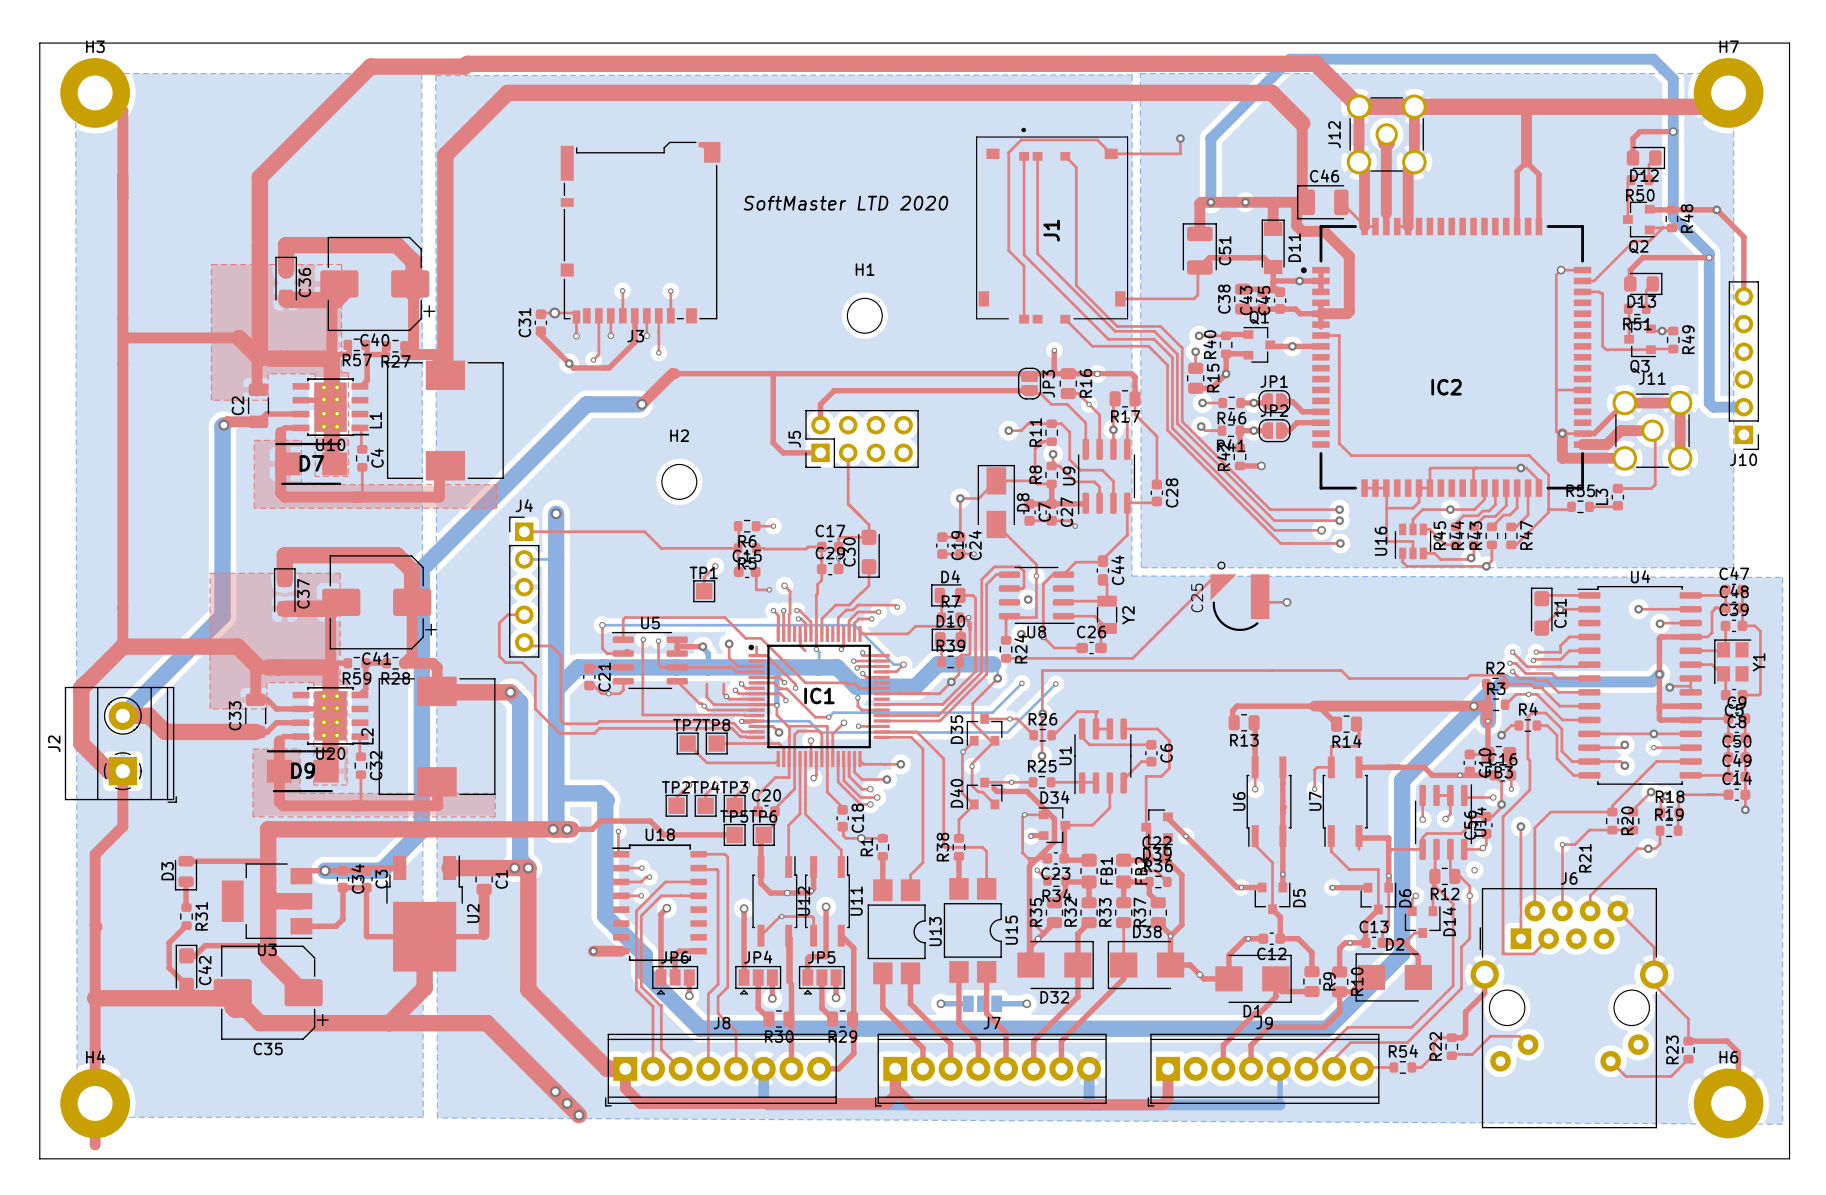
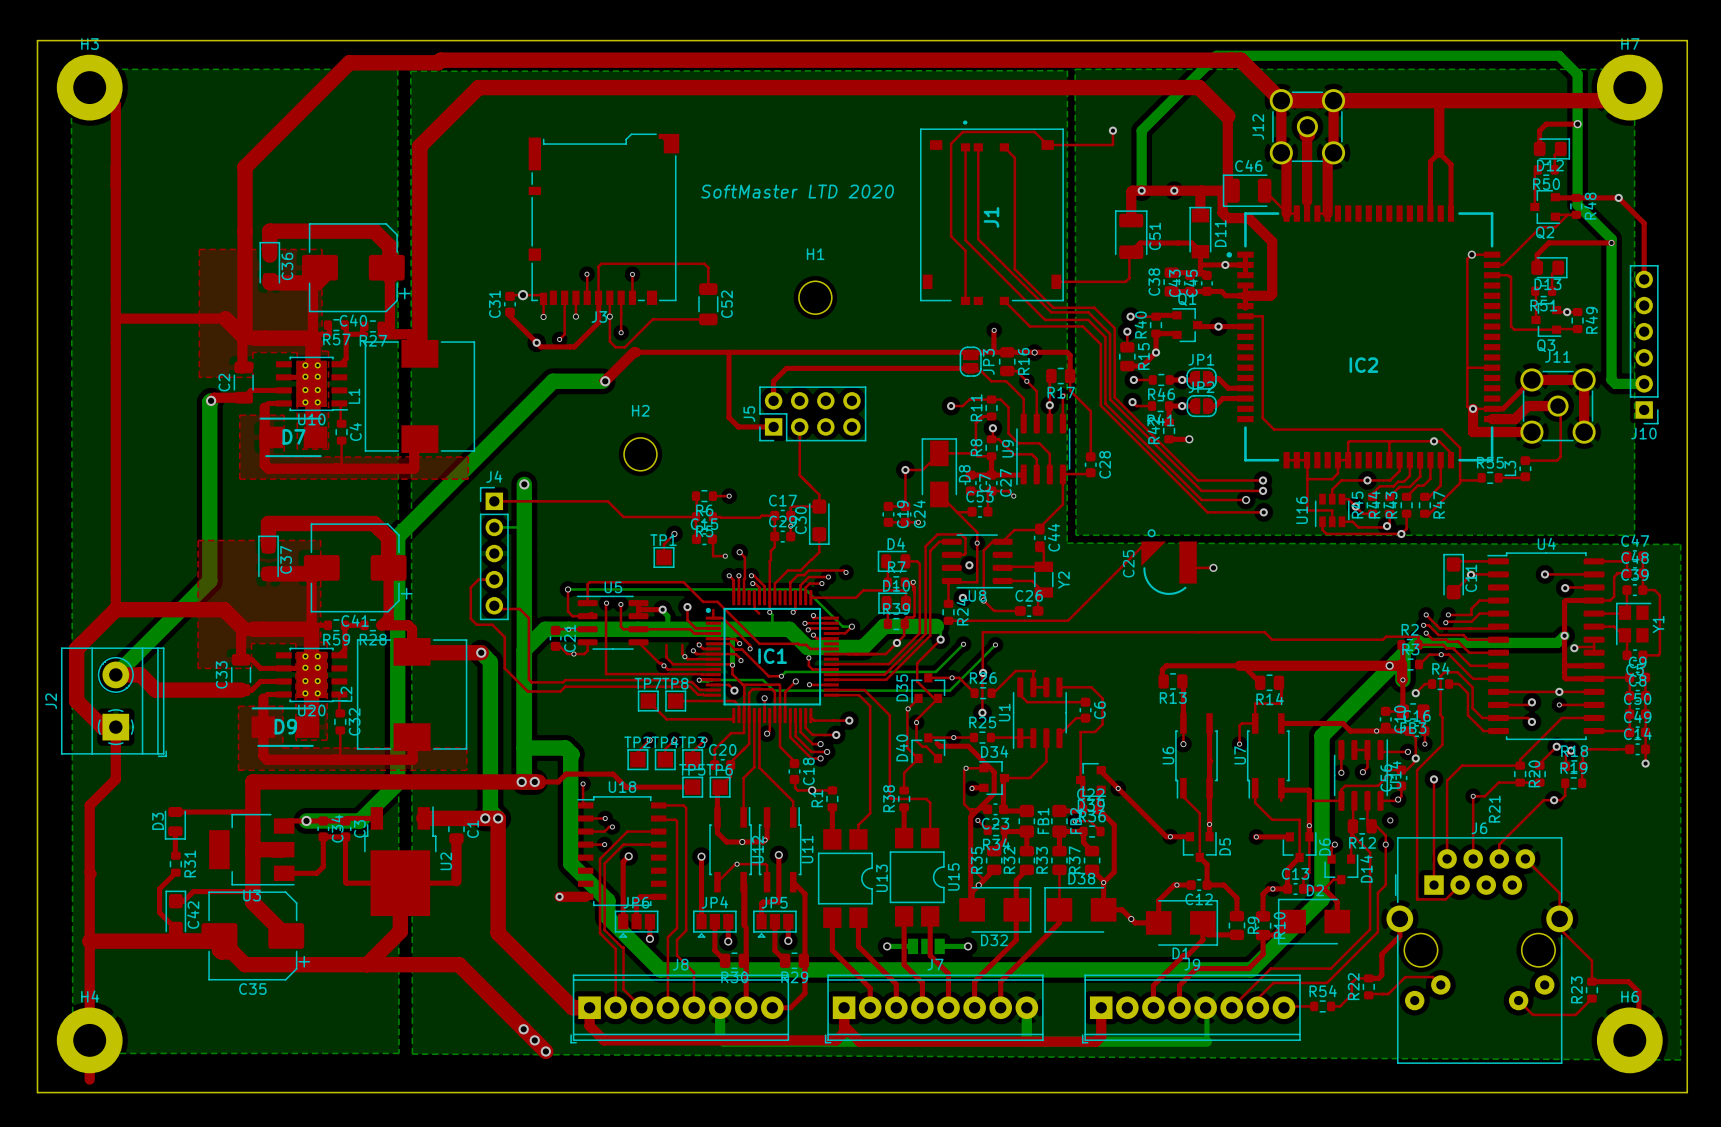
top track: none -> (708, 289) (708, 267) (704, 263) (601, 263) (598, 266) (598, 297)
C52: none -> (708, 304)
top track: none -> (609, 316) (609, 341) (615, 347) (624, 347) (652, 319) (708, 319)
top track: none -> (991, 491) (987, 494) (987, 511)
top track: none -> (972, 511) (957, 512)
C53: none -> (979, 511)

